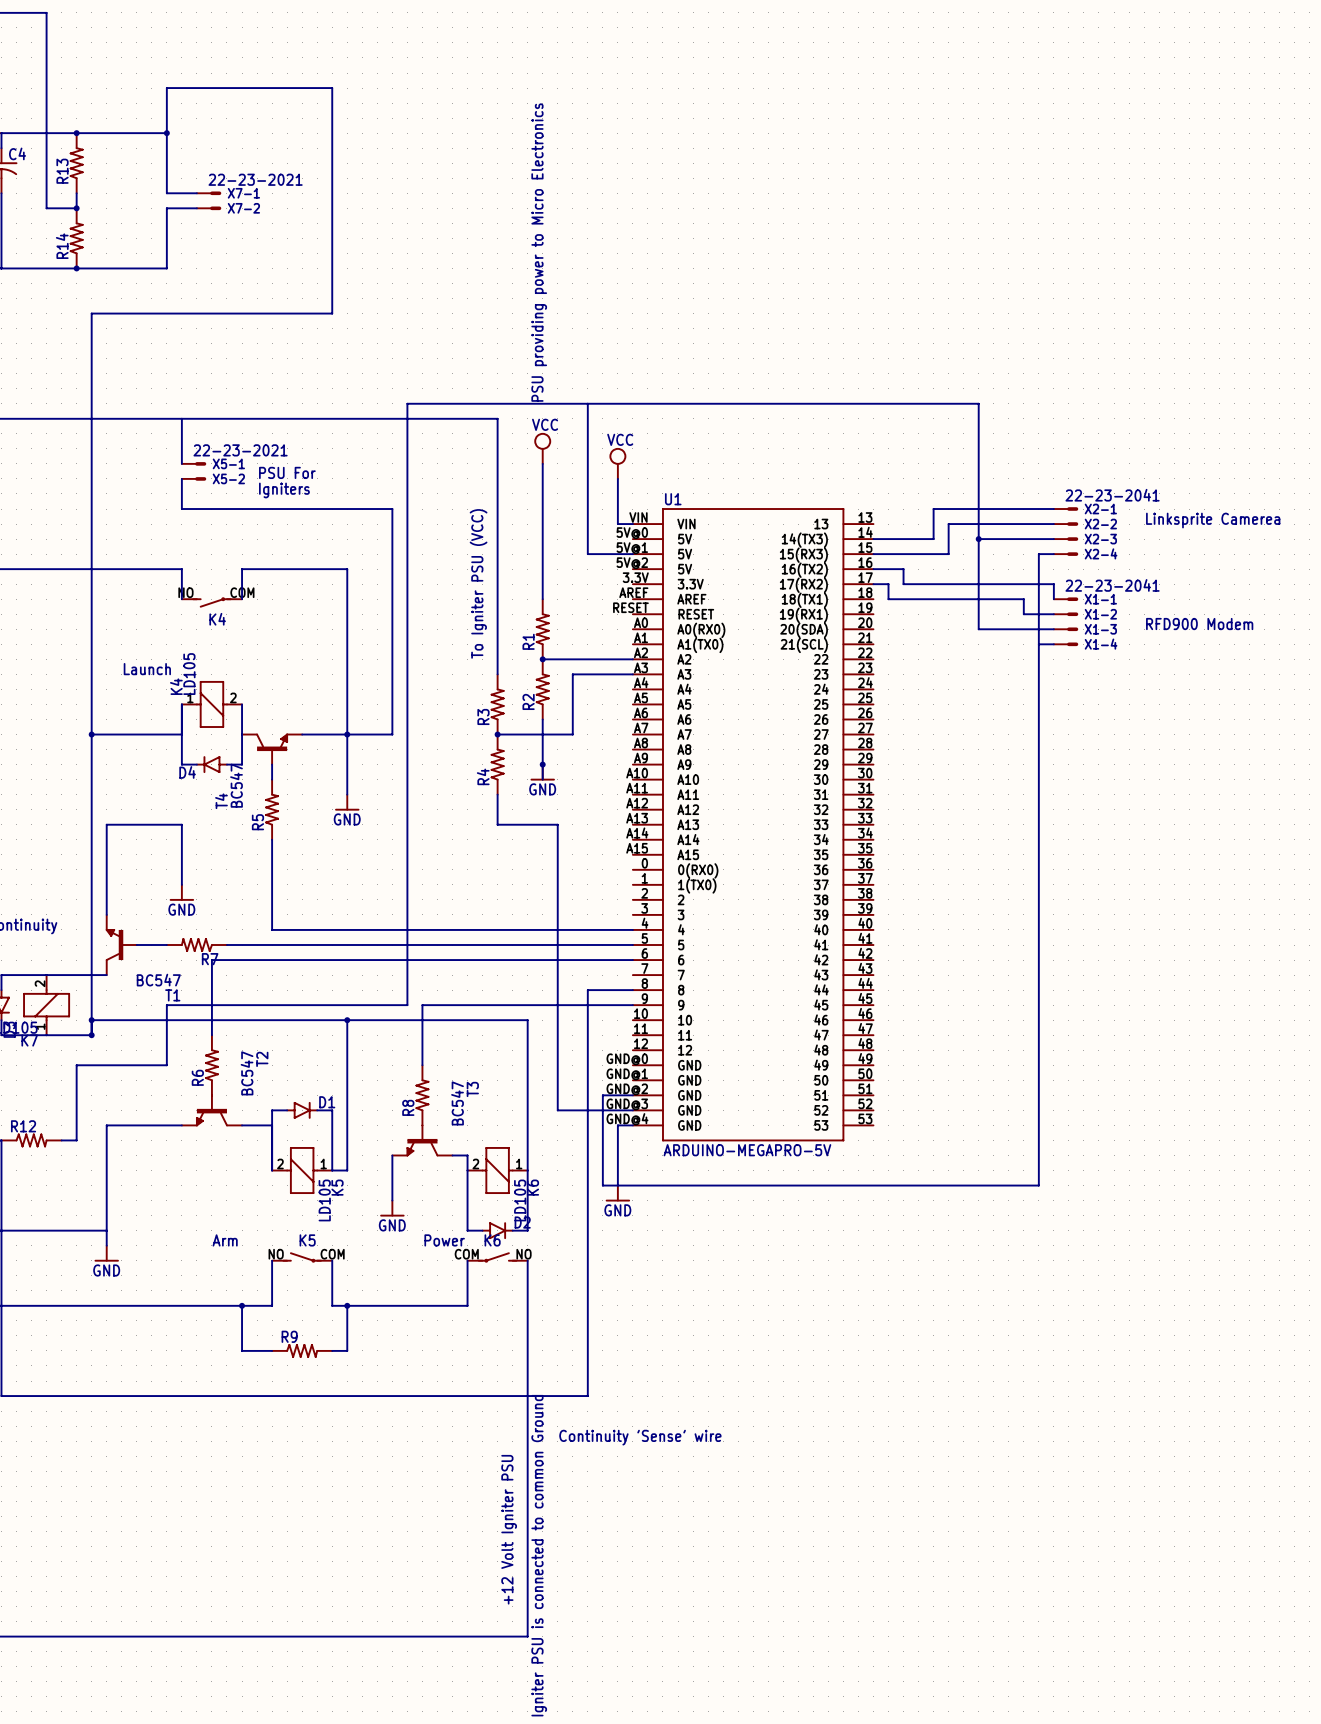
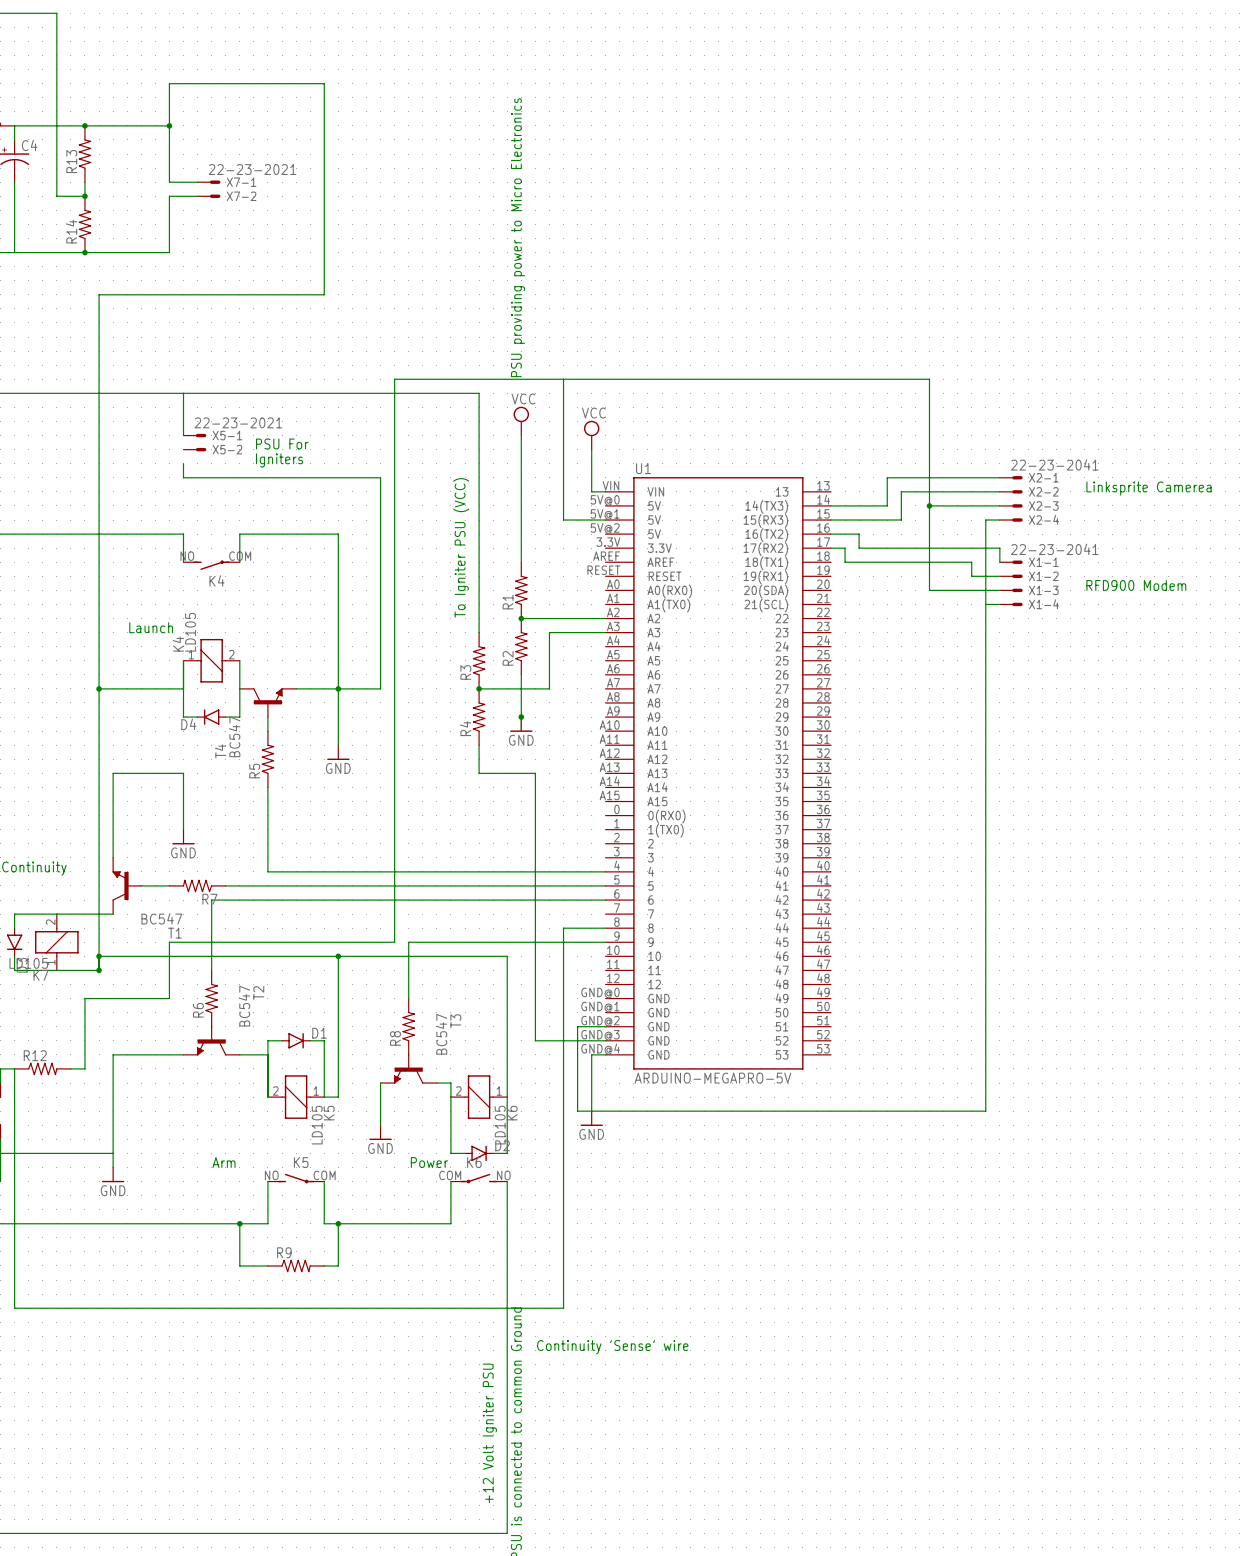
wire: (181, 478) (181, 493) -> none

